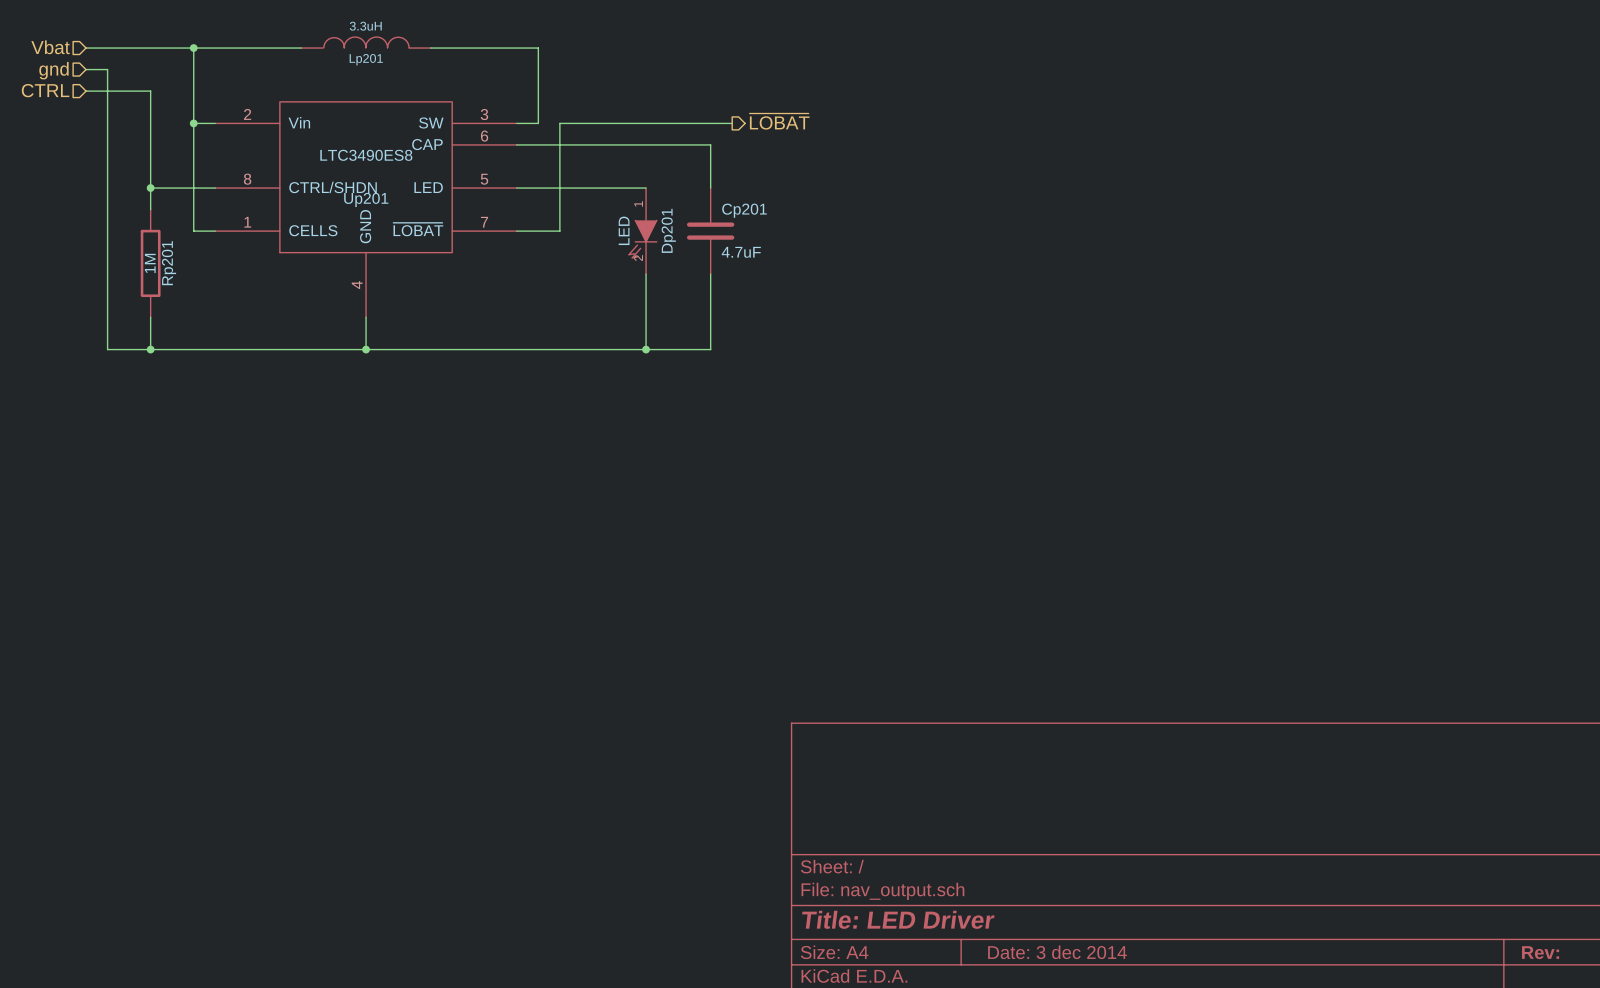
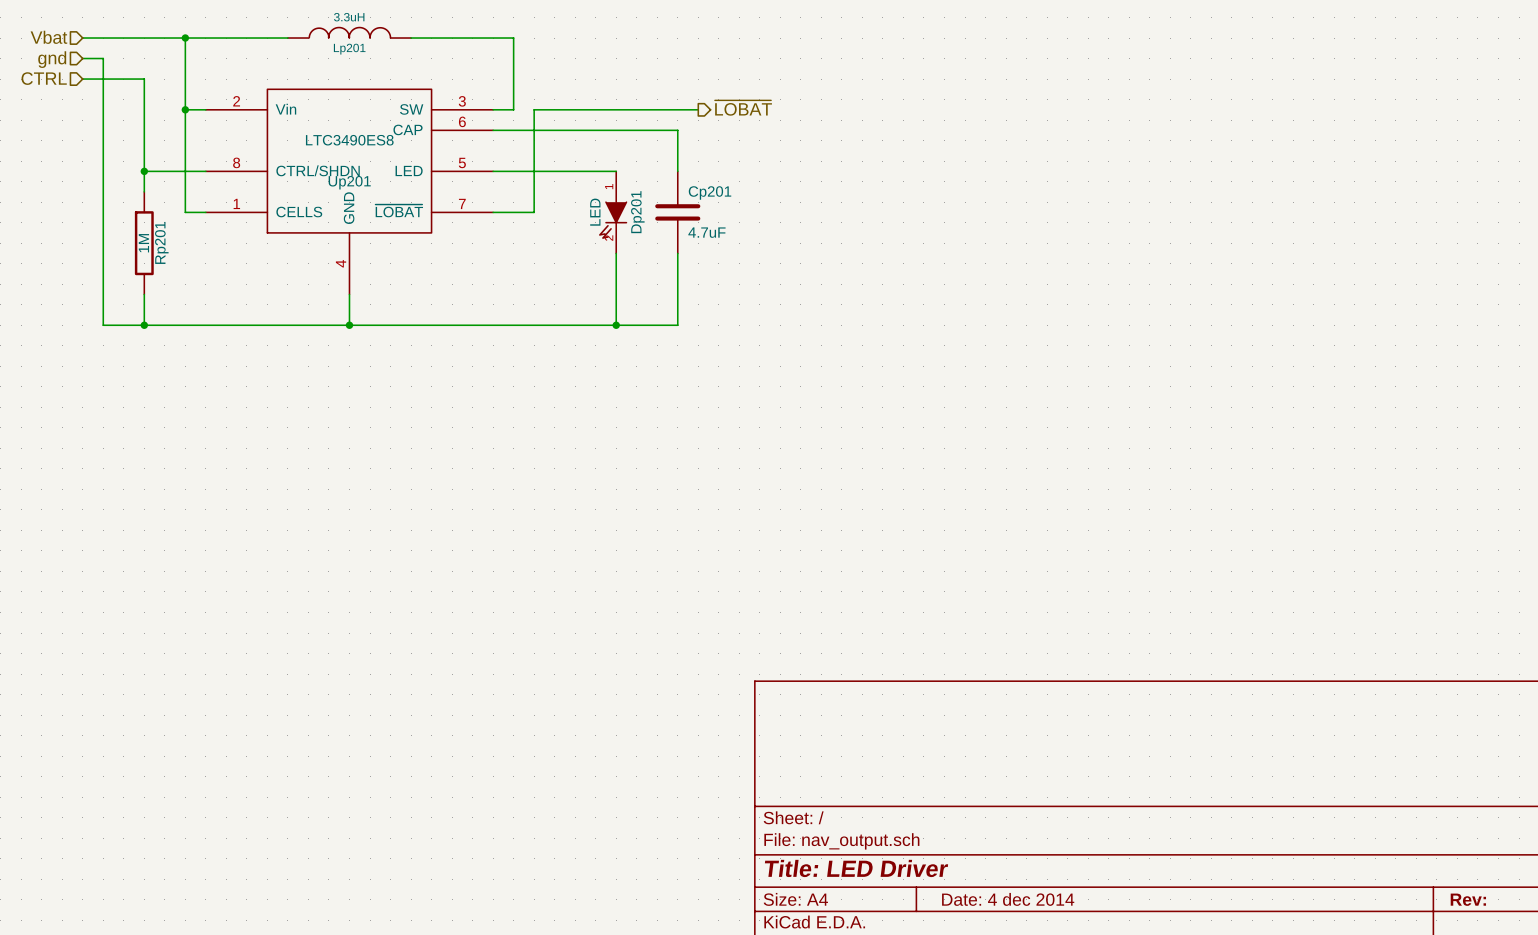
title block: Date: 3 dec 2014 (1057, 952) -> Date: 4 dec 2014 (1008, 899)

